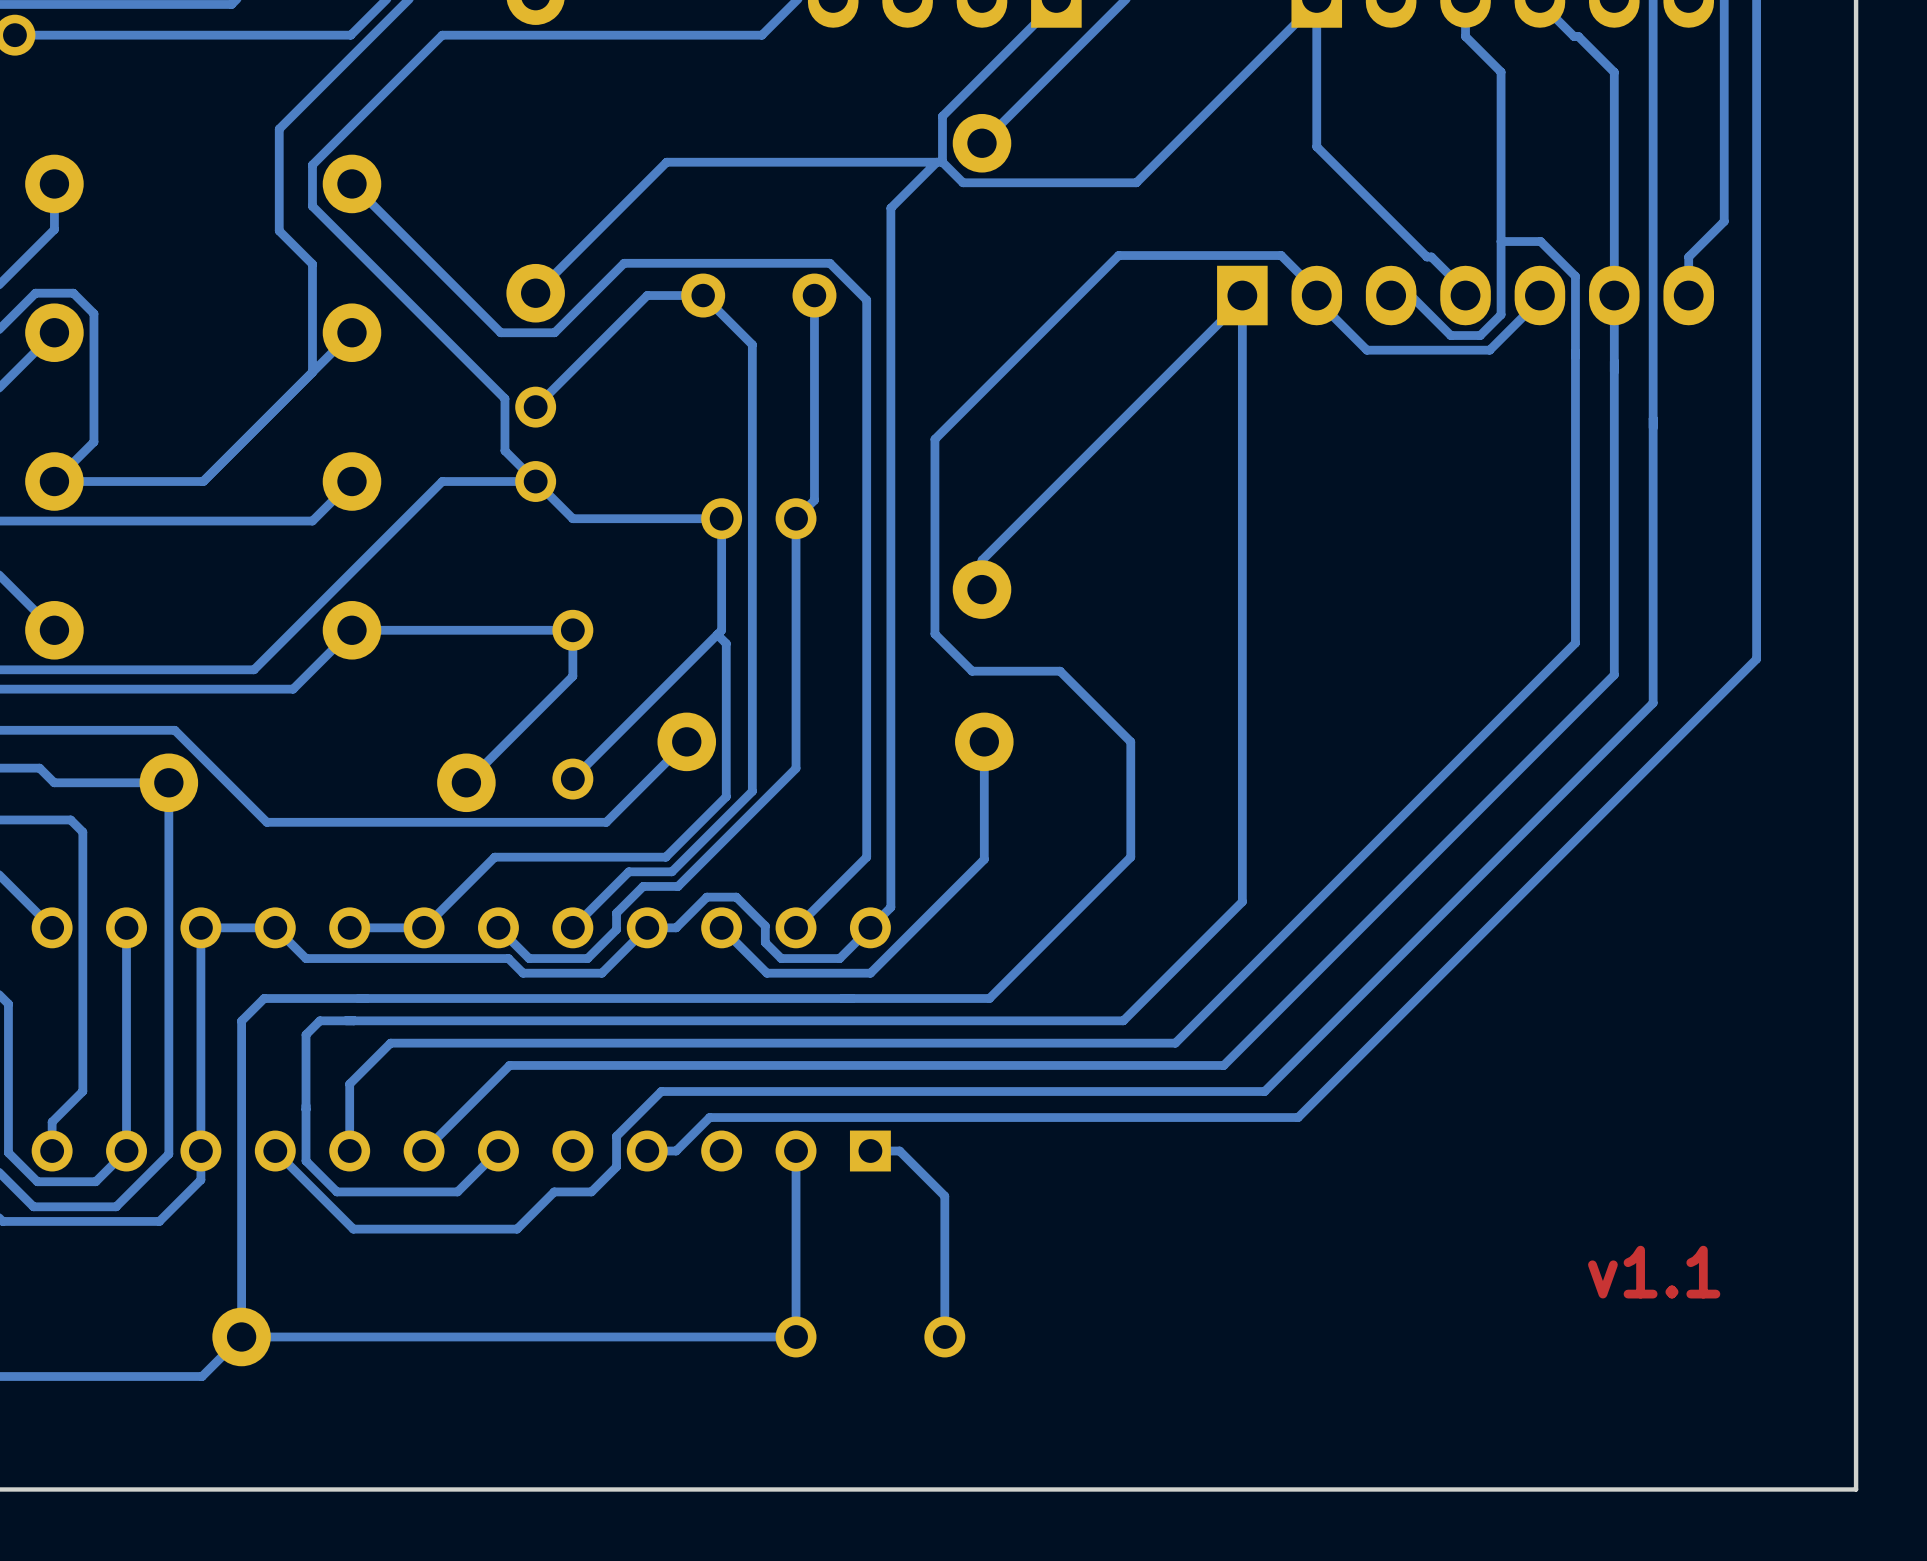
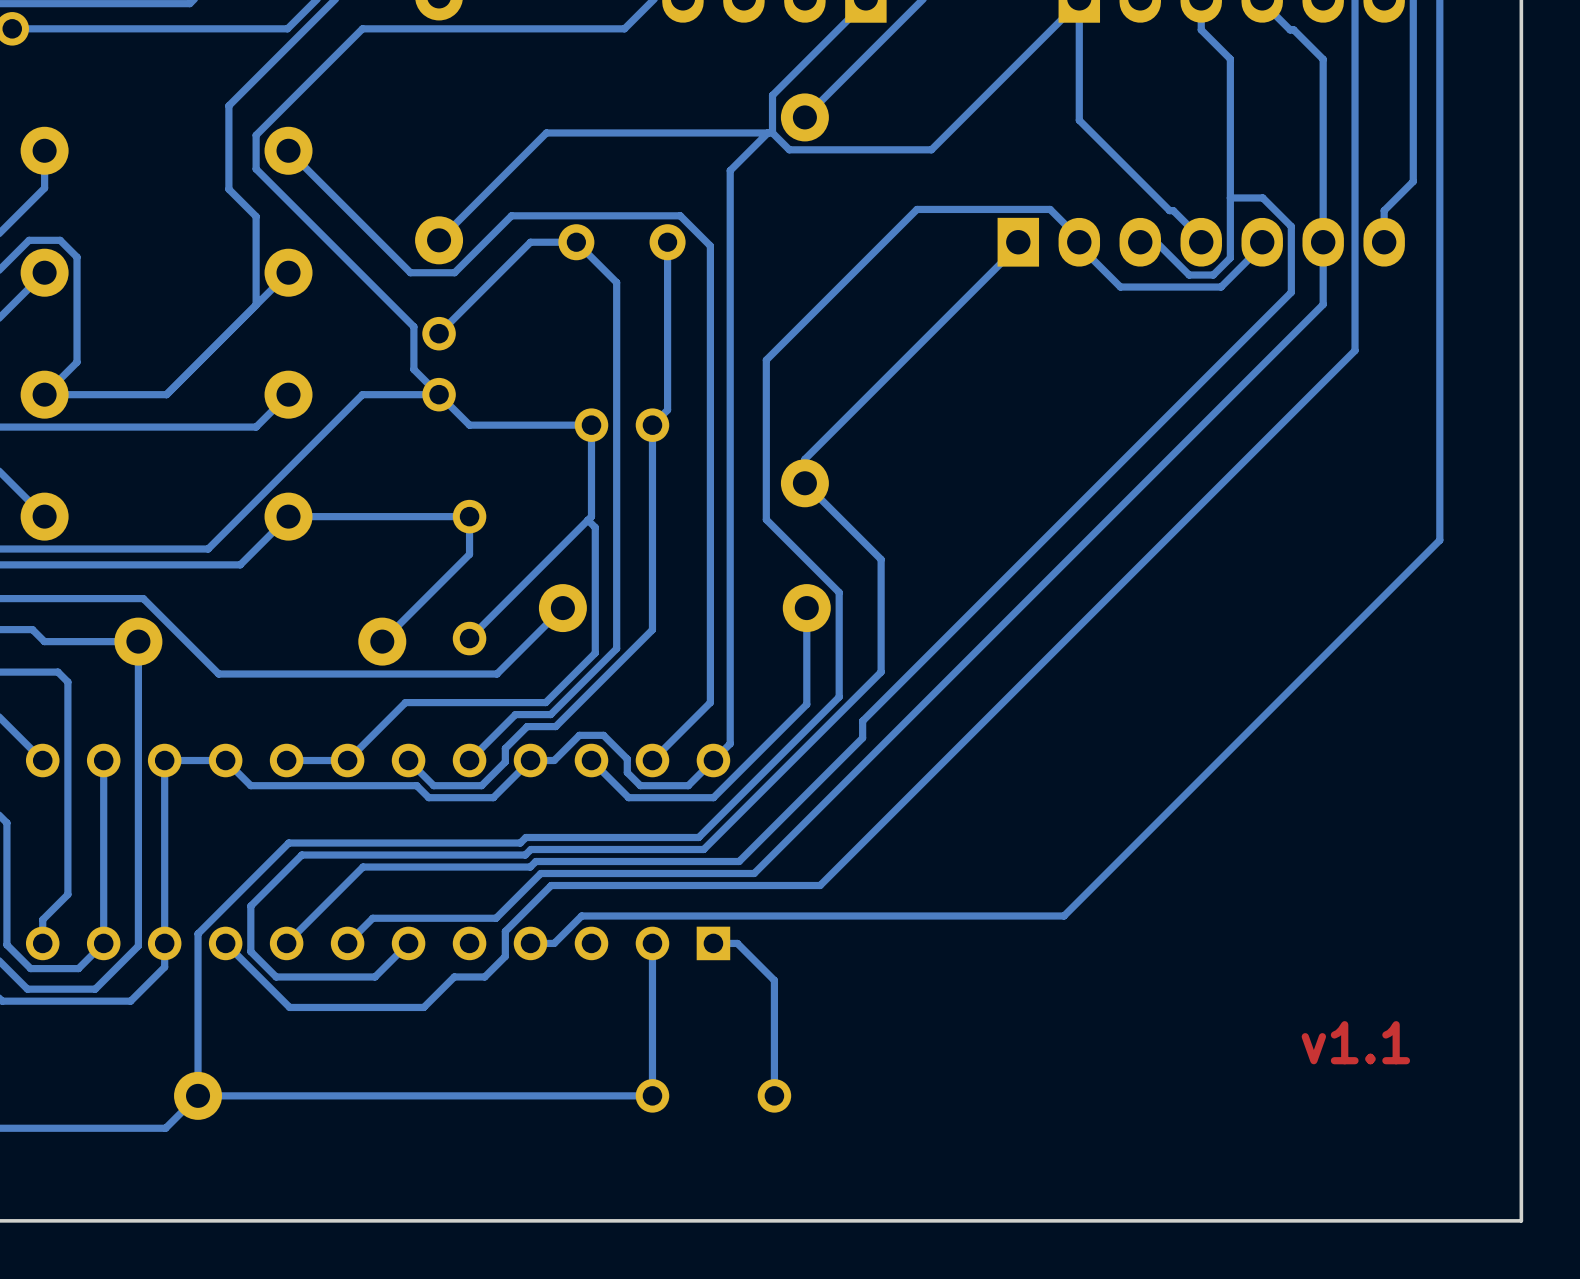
bottom track: (1242, 299) (1242, 901) (1123, 1020) (319, 1020) (306, 1034) (306, 1105) -> none
bottom track: (1575, 356) (1575, 643) (1175, 1043) (640, 1043) -> (1291, 292) (862, 721) (862, 738) (739, 861) (535, 861) (530, 867) (363, 867) (286, 943)
bottom track: (1614, 371) (1614, 674) (1223, 1065) (509, 1065) (454, 1120) -> (1323, 304) (754, 873) (540, 873) (496, 918) (372, 918)
bottom track: (1653, 427) (1653, 703) (1264, 1091) (661, 1091) -> (1355, 350) (820, 885) (551, 885) (542, 894)
bottom track: none -> (804, 483) (881, 559) (881, 672) (703, 849) (530, 849) (525, 855)
bottom track: (972, 671) (1060, 671) (1130, 741) (1130, 857) (989, 998) (264, 998) (241, 1021) (241, 1139) -> (796, 550) (839, 592) (839, 697) (698, 837) (525, 837) (520, 843) (288, 843) (198, 933)
bottom track: (390, 1043) (349, 1084) (349, 1151) -> (320, 855) (301, 855) (250, 906)

